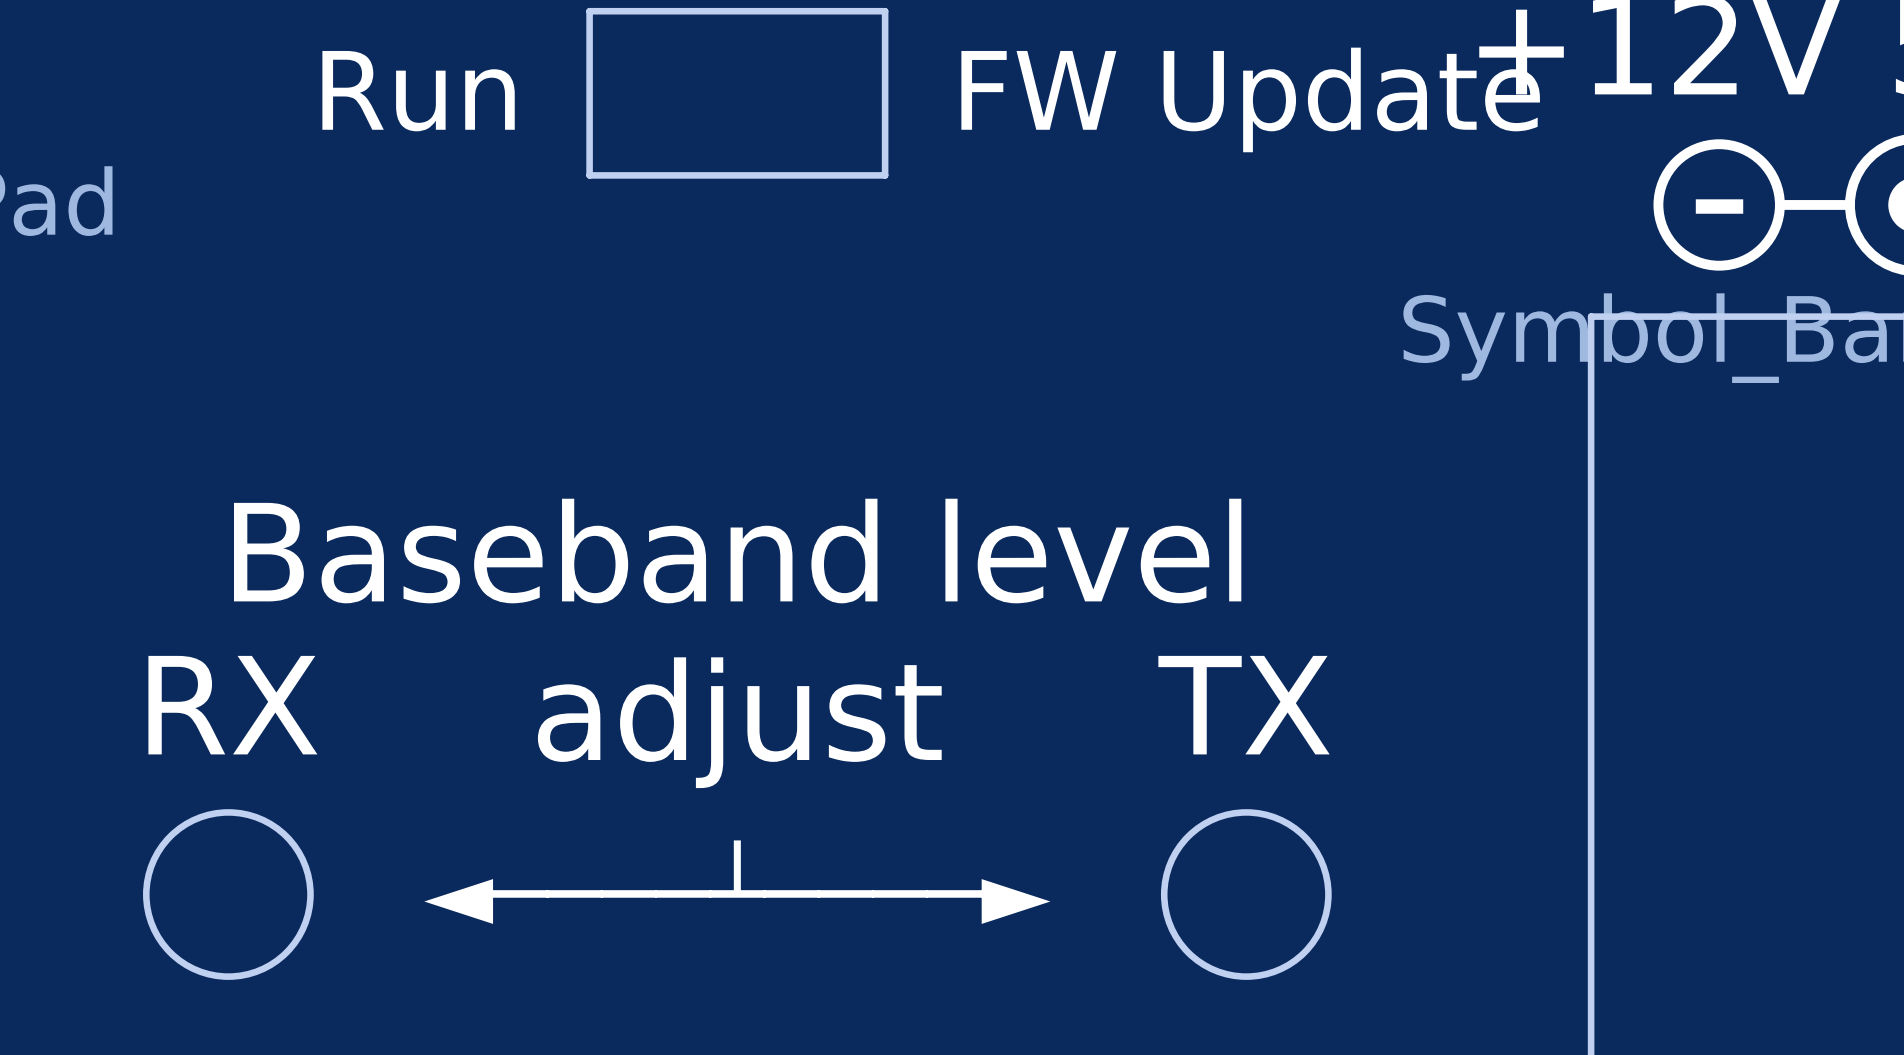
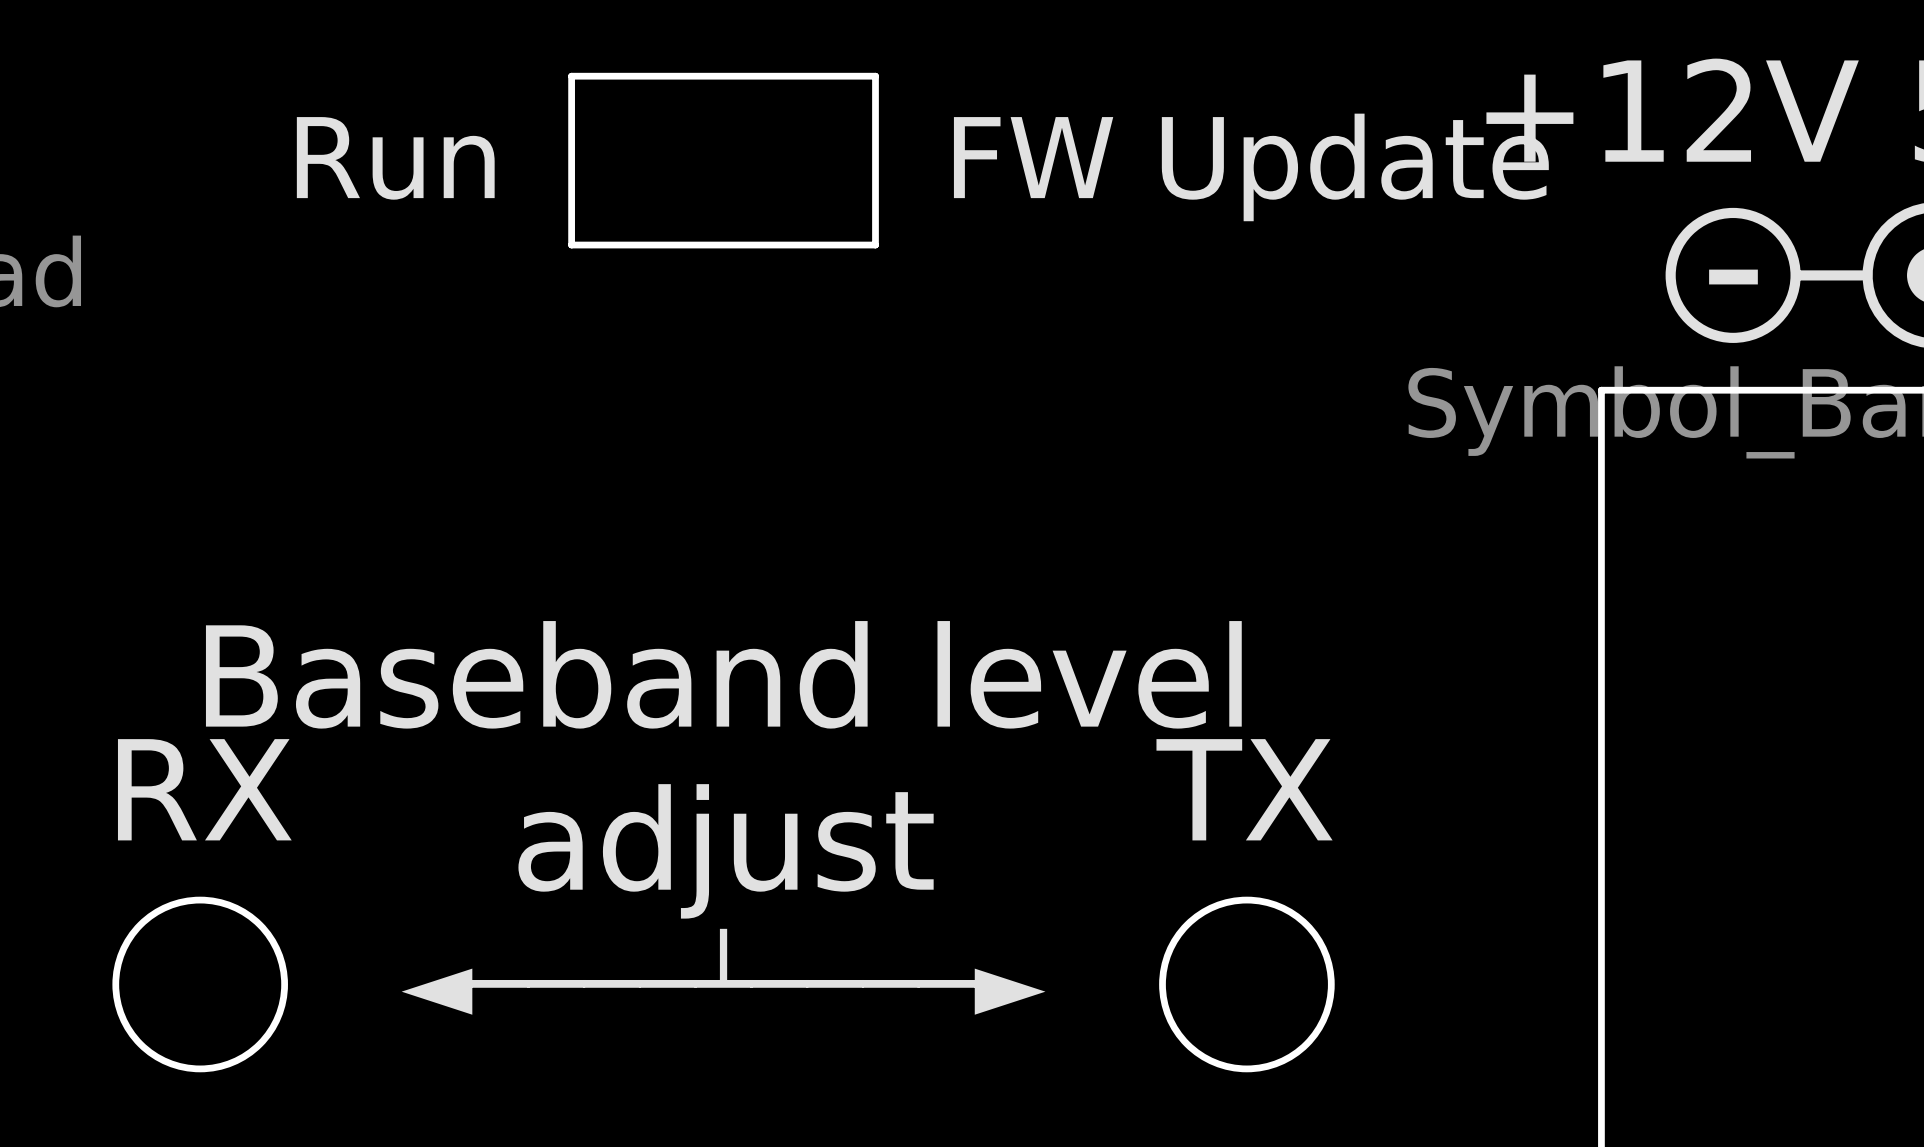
text position: Baseband level (737, 551) -> Baseband level (723, 674)
text position: adjust (739, 722) -> adjust (726, 851)

